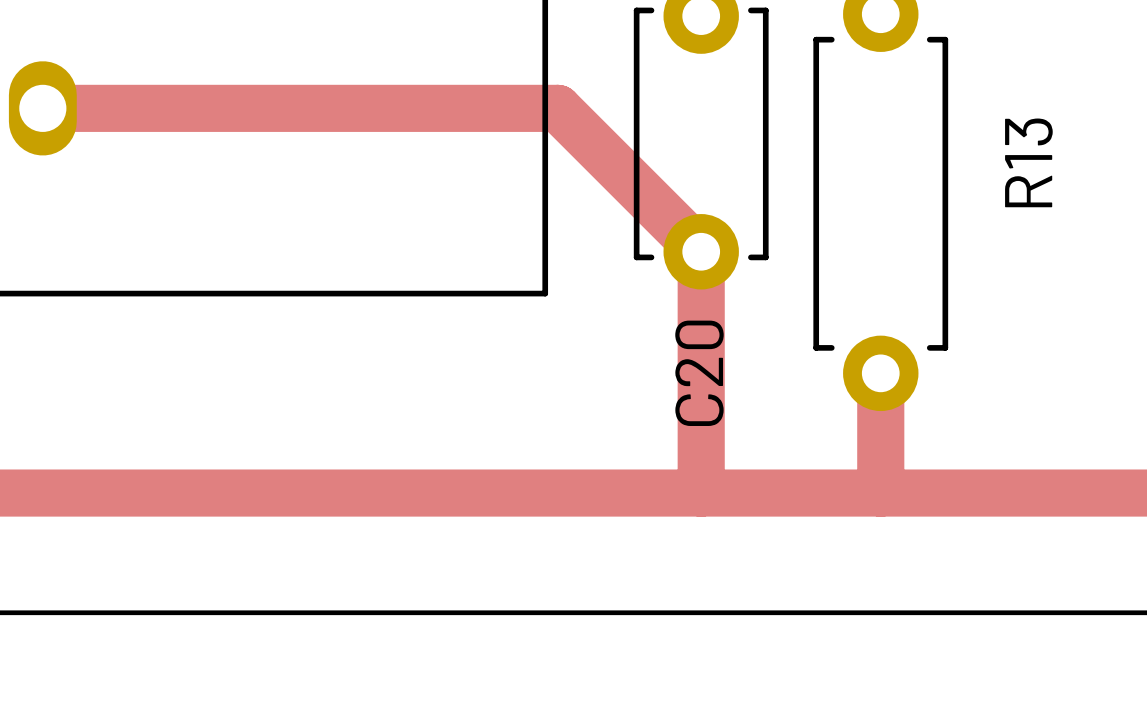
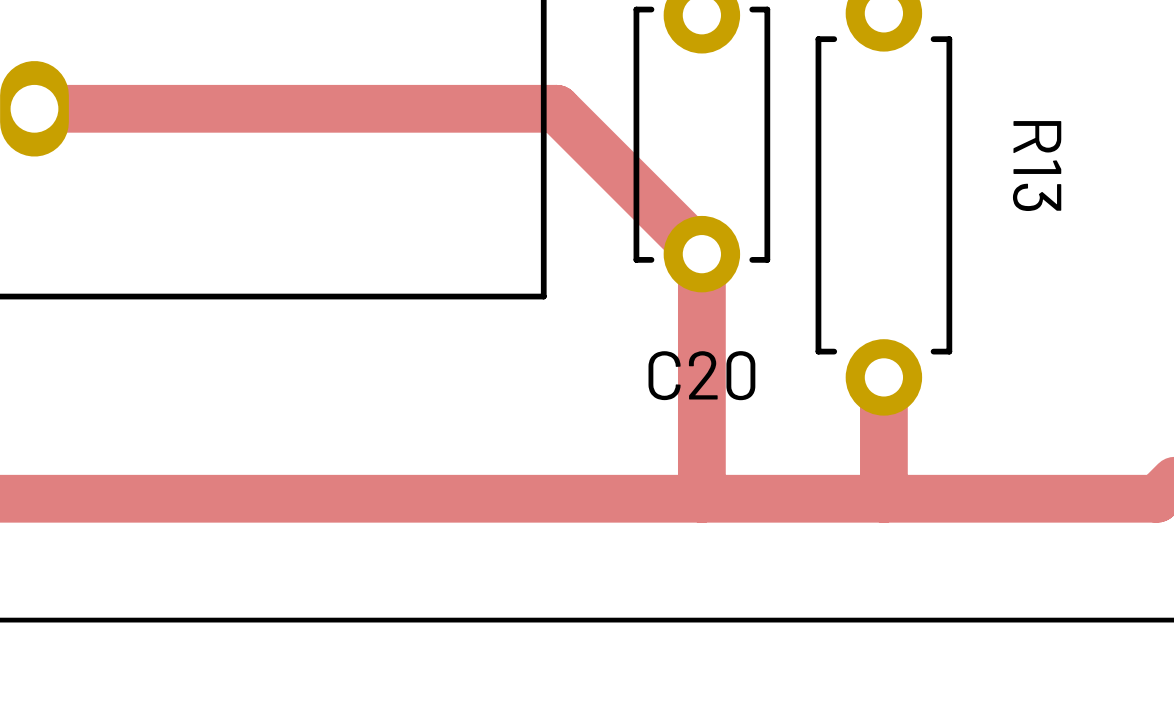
R13 name rotation: 0° (1028, 162) -> 180° (1037, 166)
C20 name rotation: 0° (699, 373) -> 90° clockwise (701, 375)

